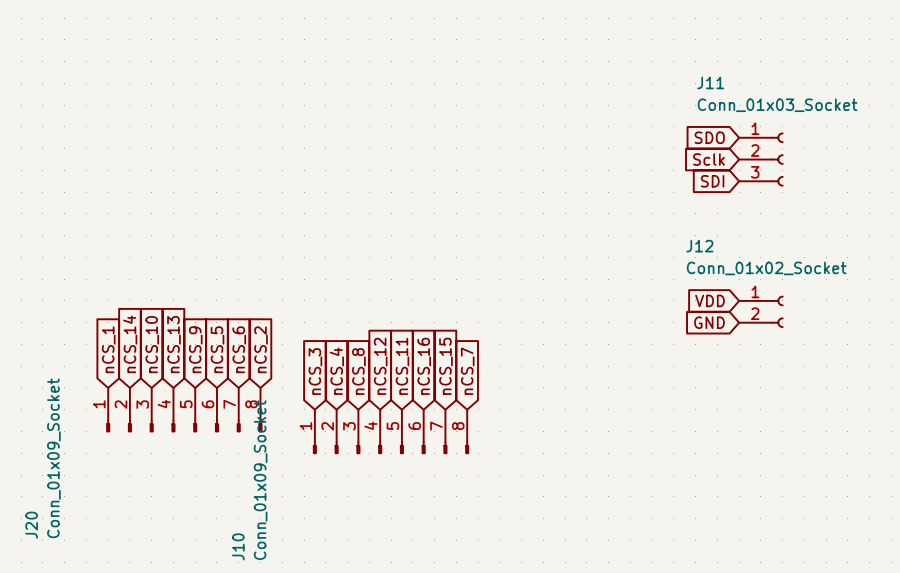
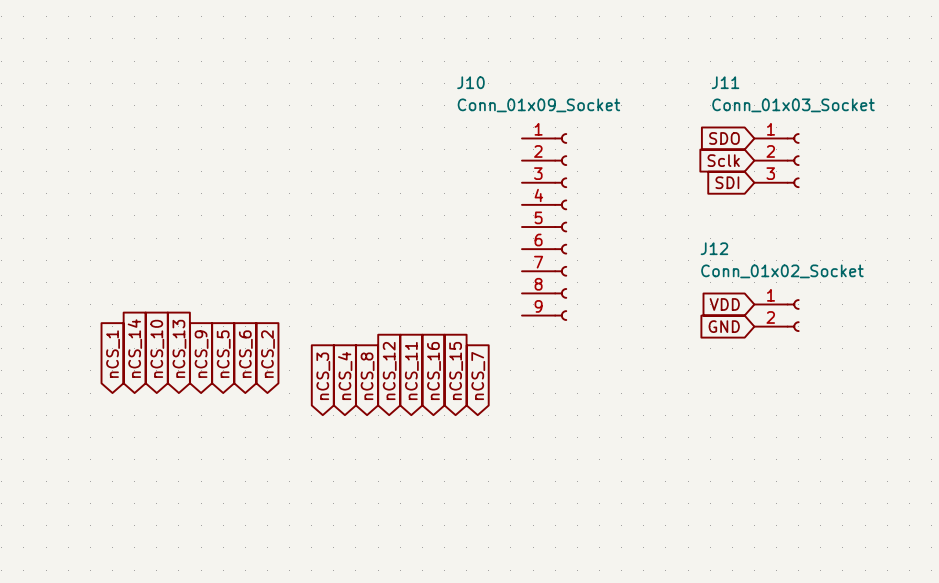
J10 symbol: [313, 409, 469, 454] -> [521, 133, 567, 321]
J20: Conn_01x09_Socket (184, 410) -> none
J10 value position: Conn_01x09_Socket (260, 480) -> Conn_01x09_Socket (538, 105)
J10 name position: J10 (238, 546) -> J10 (470, 82)

